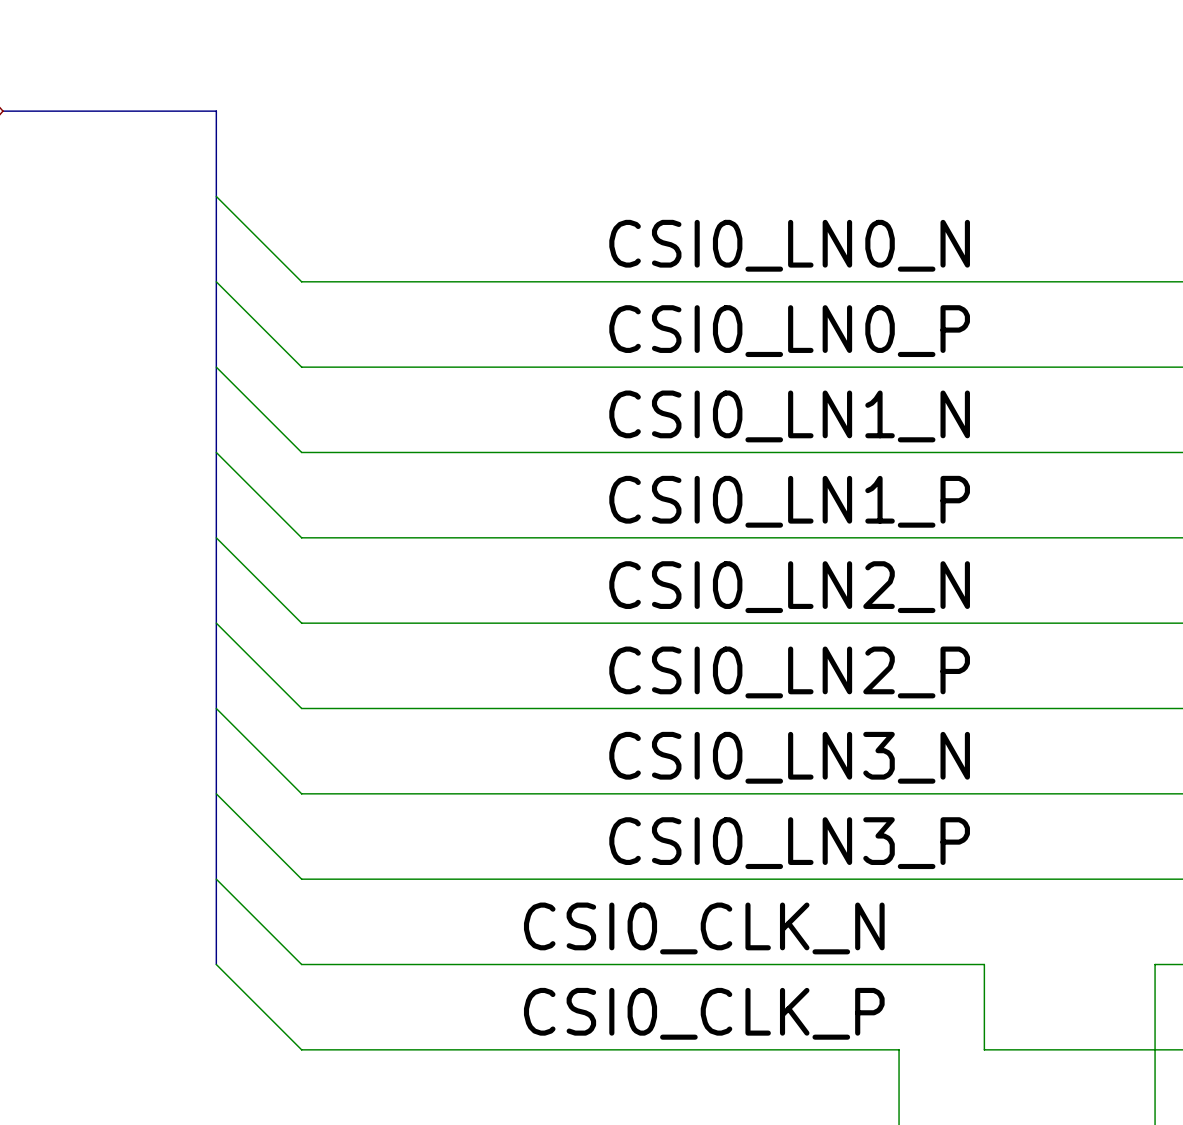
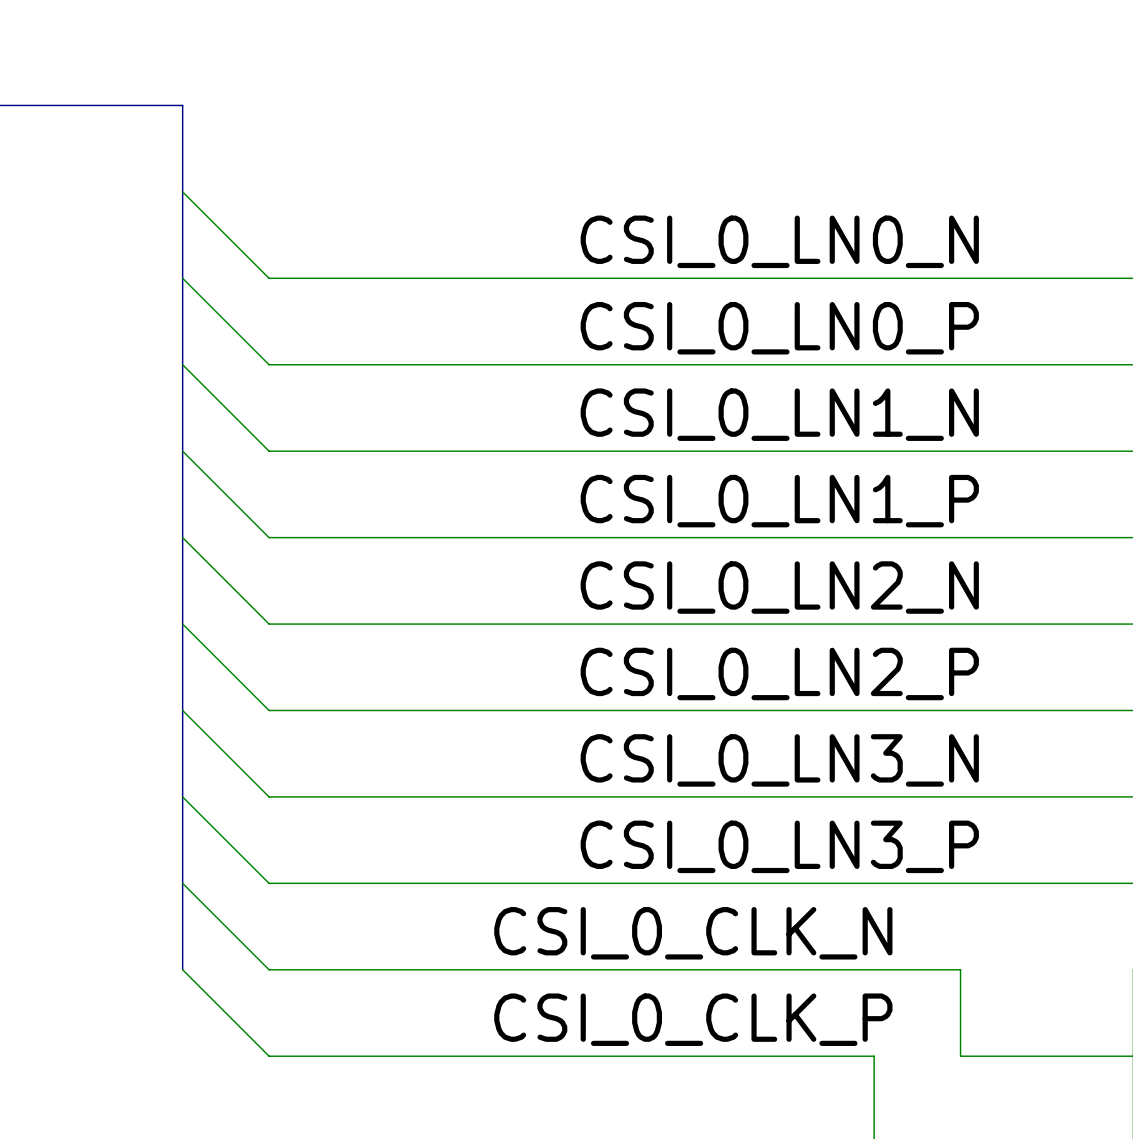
label: CSI0_LN0_N (789, 245) -> CSI_0_LN0_N (779, 241)
label: CSI0_LN0_P (789, 331) -> CSI_0_LN0_P (779, 328)
label: CSI0_LN1_N (789, 416) -> CSI_0_LN1_N (779, 414)
label: CSI0_LN1_P (789, 501) -> CSI_0_LN1_P (779, 501)
label: CSI0_LN2_N (789, 587) -> CSI_0_LN2_N (779, 587)
label: CSI0_LN2_P (789, 672) -> CSI_0_LN2_P (779, 673)
label: CSI0_LN3_N (789, 757) -> CSI_0_LN3_N (779, 760)
label: CSI0_LN3_P (789, 843) -> CSI_0_LN3_P (779, 846)
label: CSI0_CLK_N (704, 928) -> CSI_0_CLK_N (693, 933)
label: CSI0_CLK_P (704, 1013) -> CSI_0_CLK_P (693, 1019)

